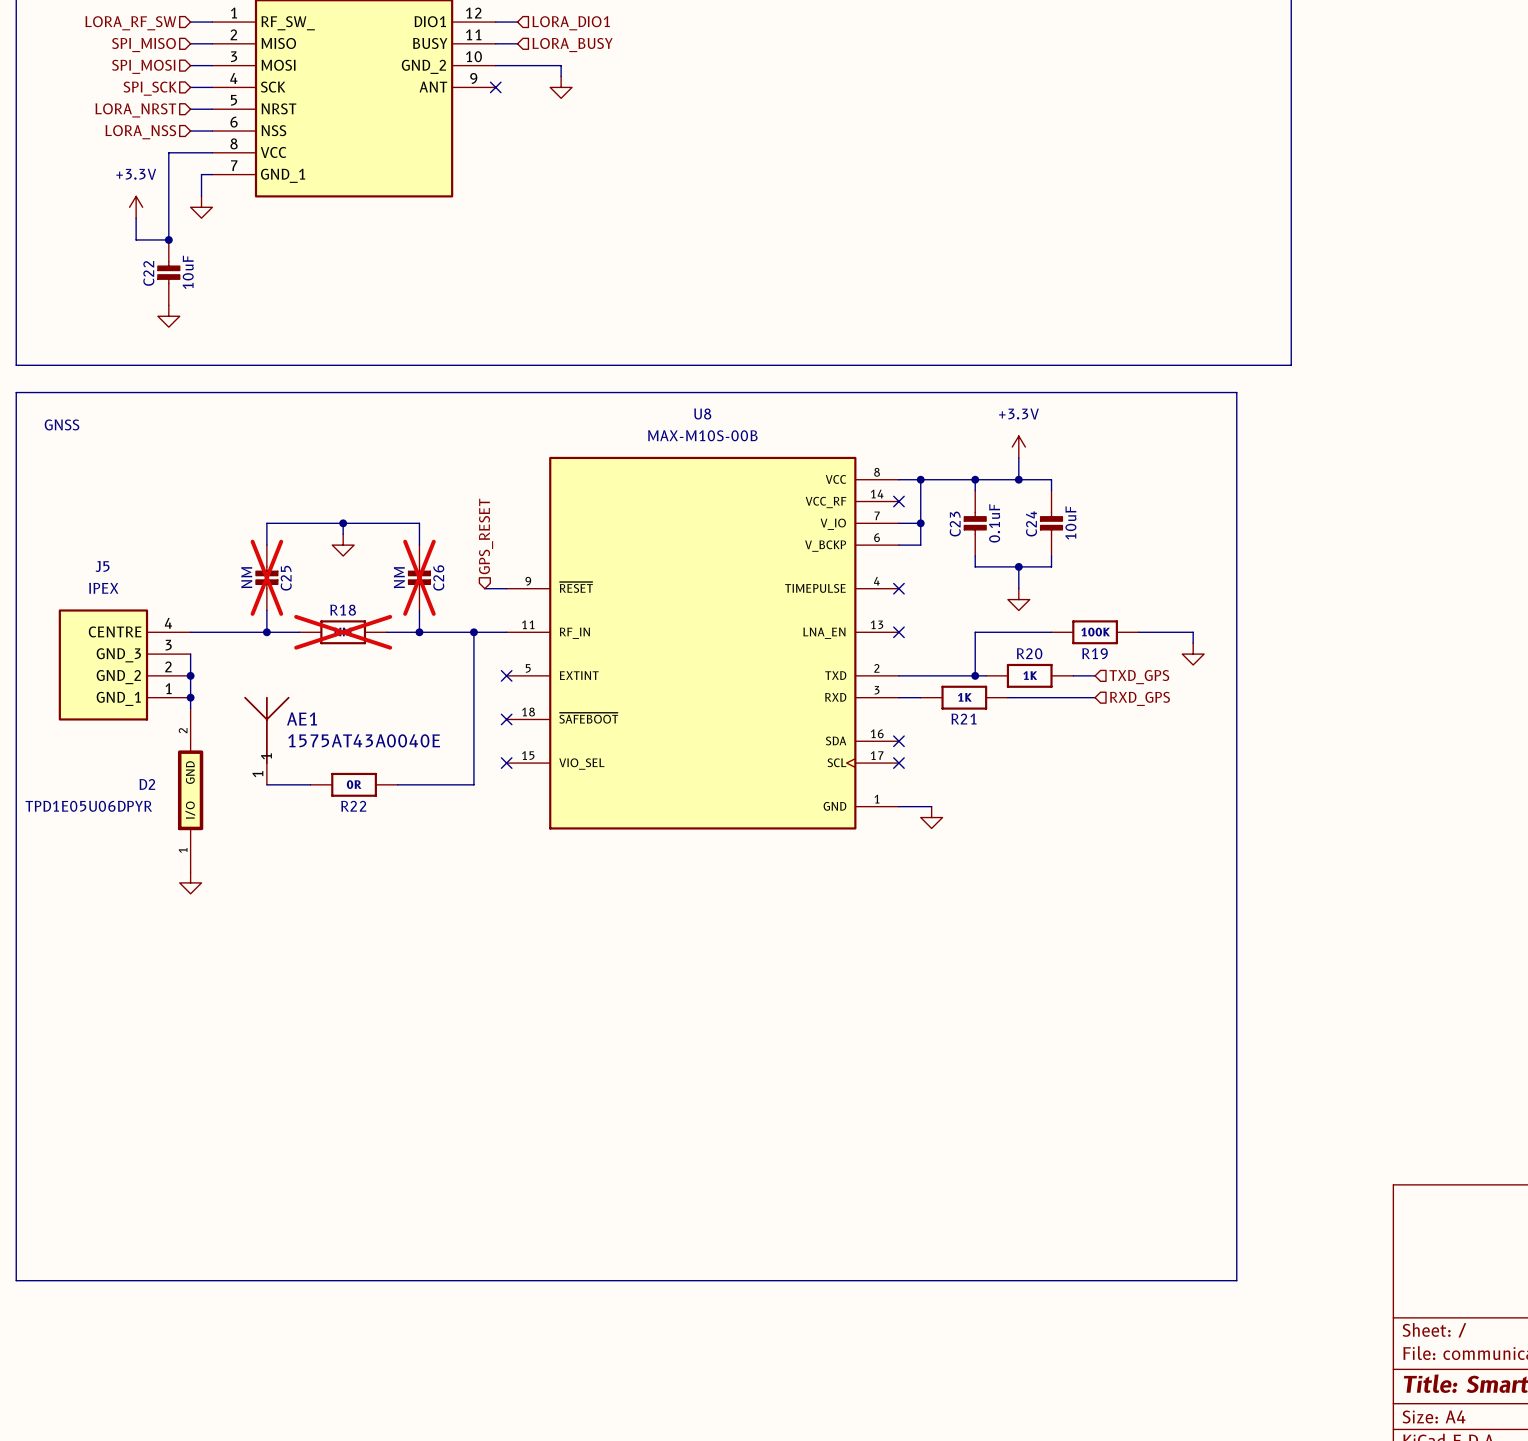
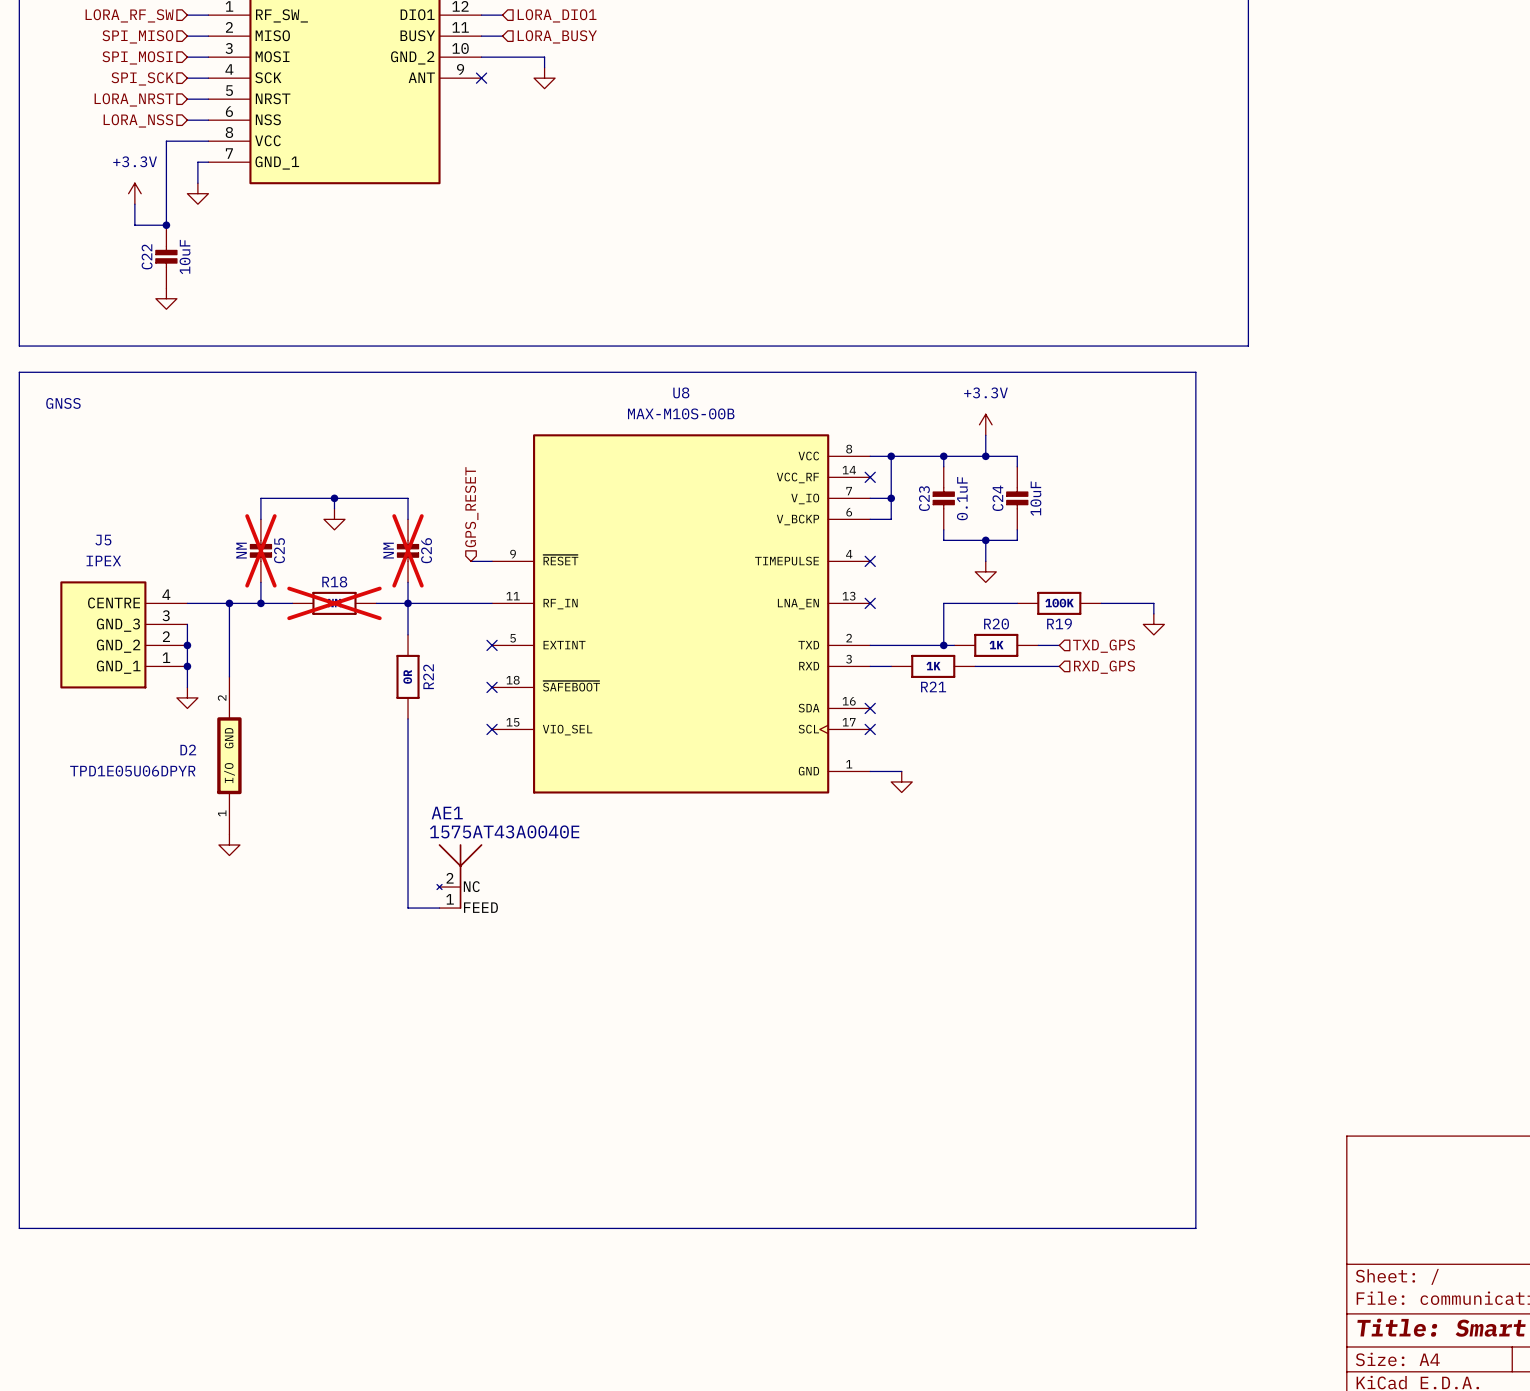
wire: none -> (229, 603) (229, 676)
junction: none -> (229, 603)
wire: none -> (408, 603) (408, 634)
wire: (473, 632) (473, 784) (397, 784) -> none
junction: (473, 632) -> none
AE1 symbol: [244, 696, 290, 785] -> [437, 844, 483, 909]
AE1 name position: AE1 (302, 718) -> AE1 (447, 813)
power symbol: none -> (187, 697)
AE1 value position: 1575AT43A0040E (364, 740) -> 1575AT43A0040E (504, 831)
wire: none -> (408, 718) (408, 908) (439, 908)
wire: (266, 784) (310, 784) -> none
R22 rotation: 0° (354, 784) -> 90° clockwise (408, 676)
R22 position: (354, 784) -> (408, 676)
D2 position: (190, 790) -> (229, 755)
R22 name position: R22 (353, 806) -> R22 (428, 676)
power symbol position: (190, 882) -> (229, 845)

